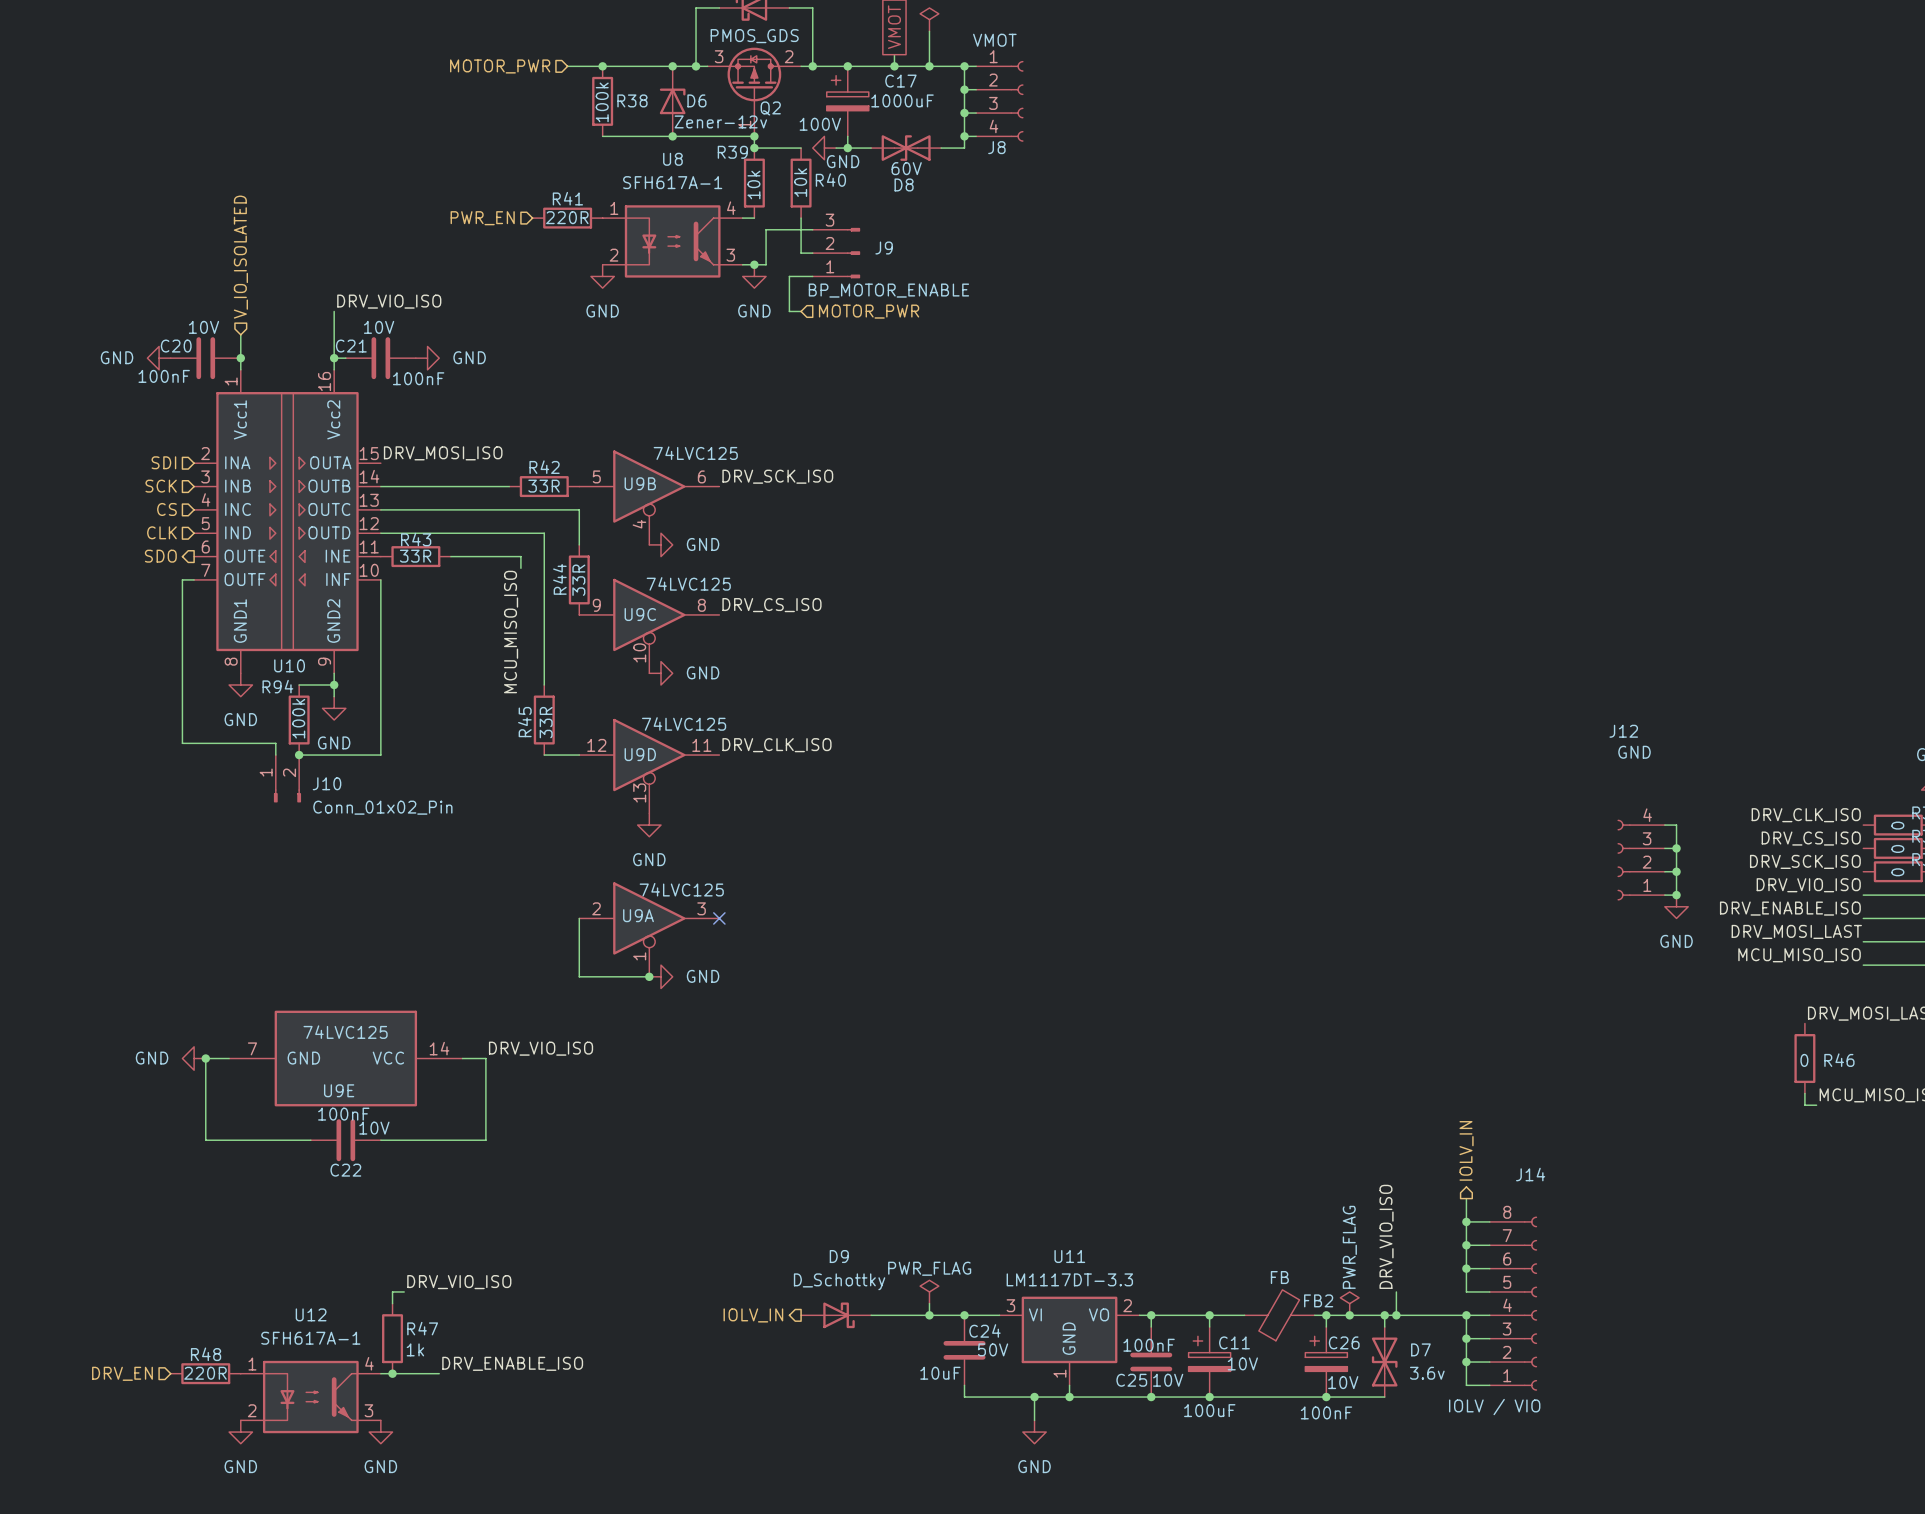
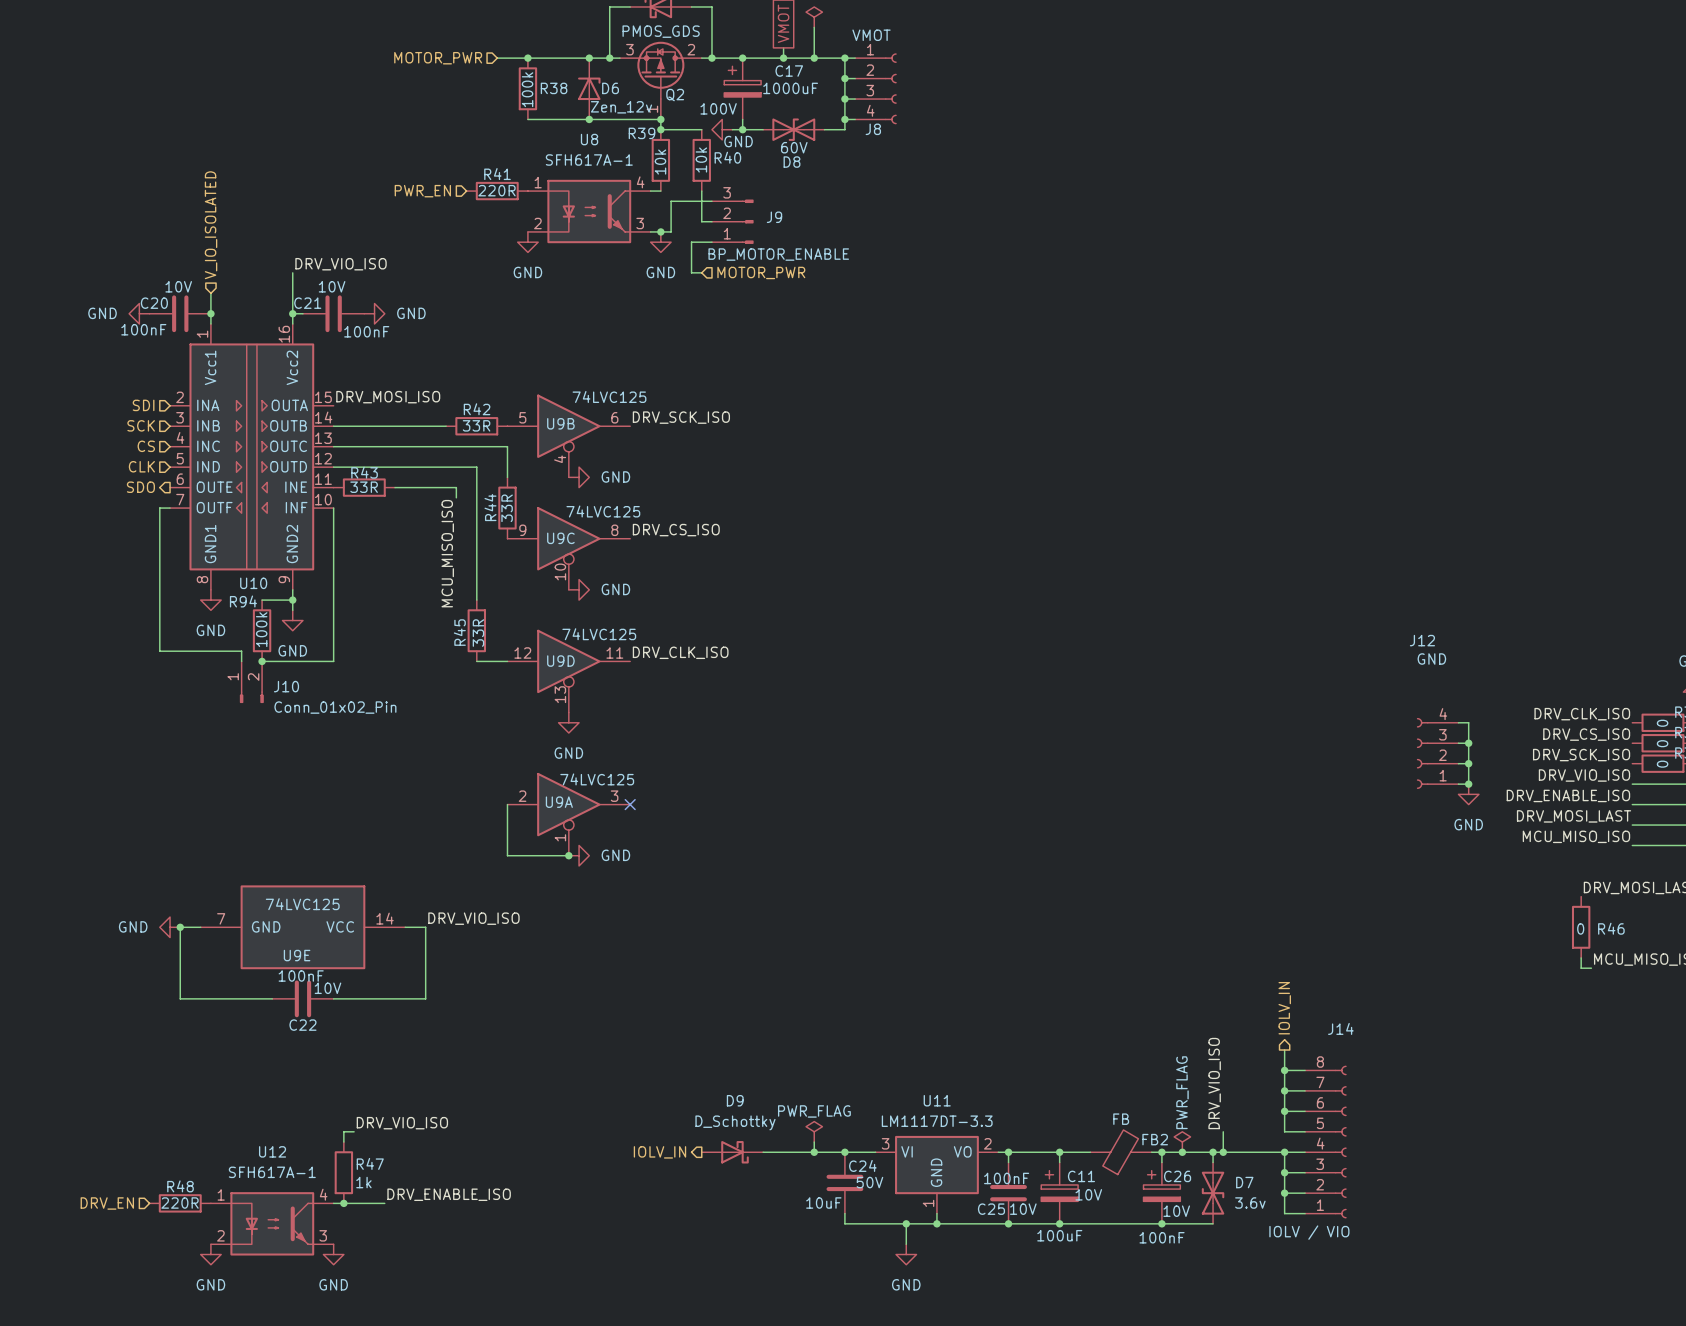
D6 value: Zener-12v (720, 121) -> Zen_12v (621, 107)

